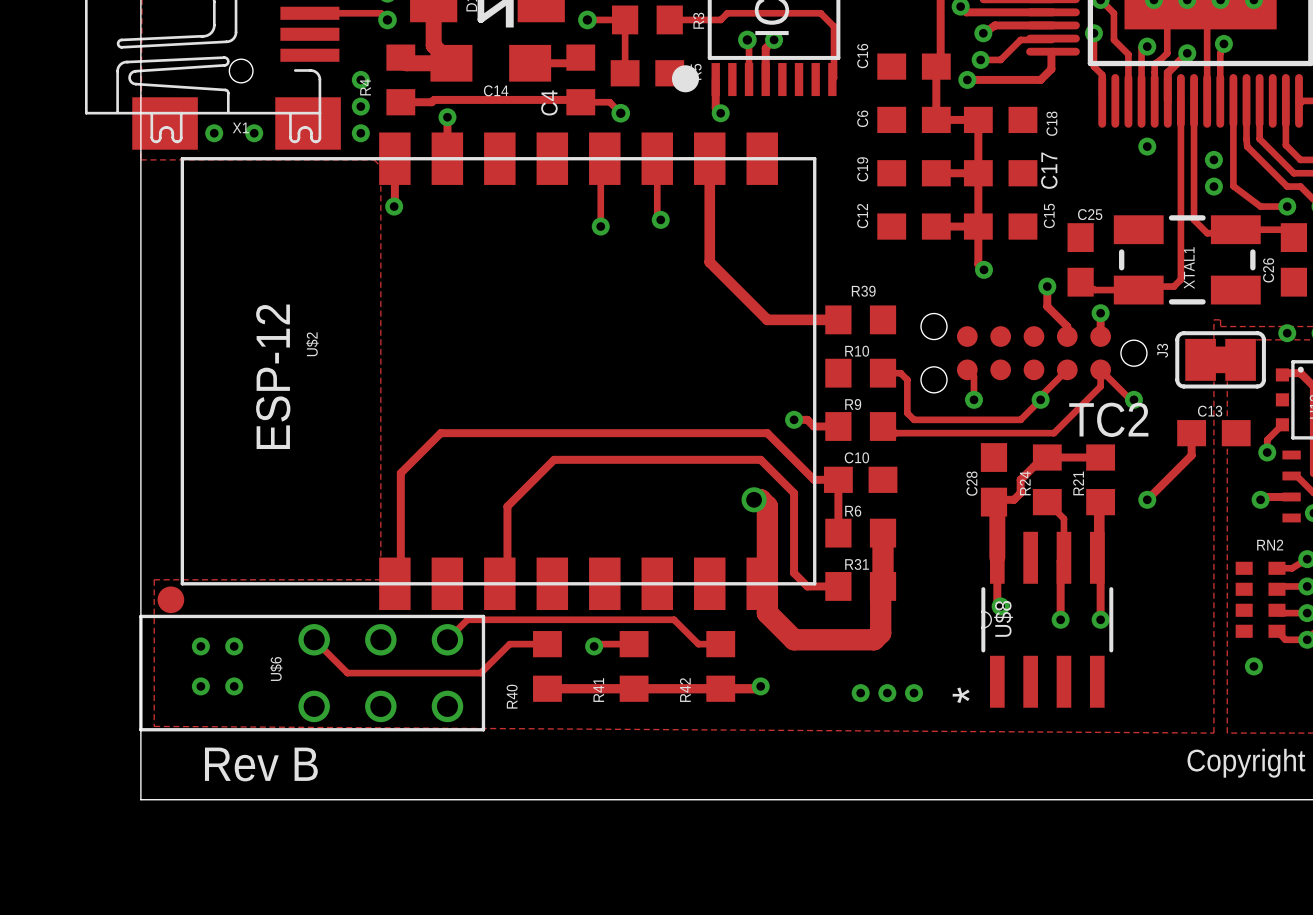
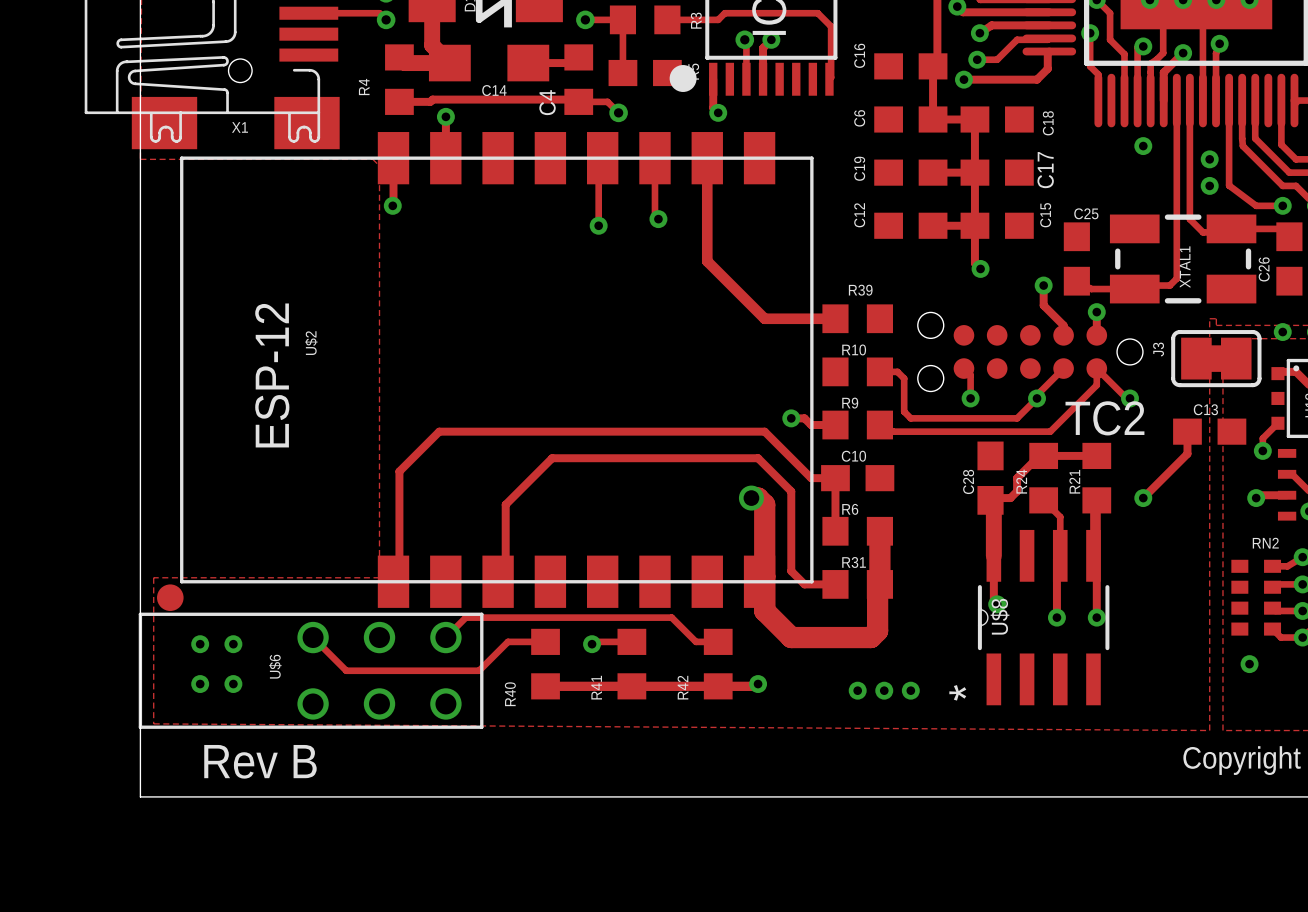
via: (360, 79) -> none
via: (360, 106) -> none
via: (214, 133) -> none
via: (254, 133) -> none
via: (360, 133) -> none

